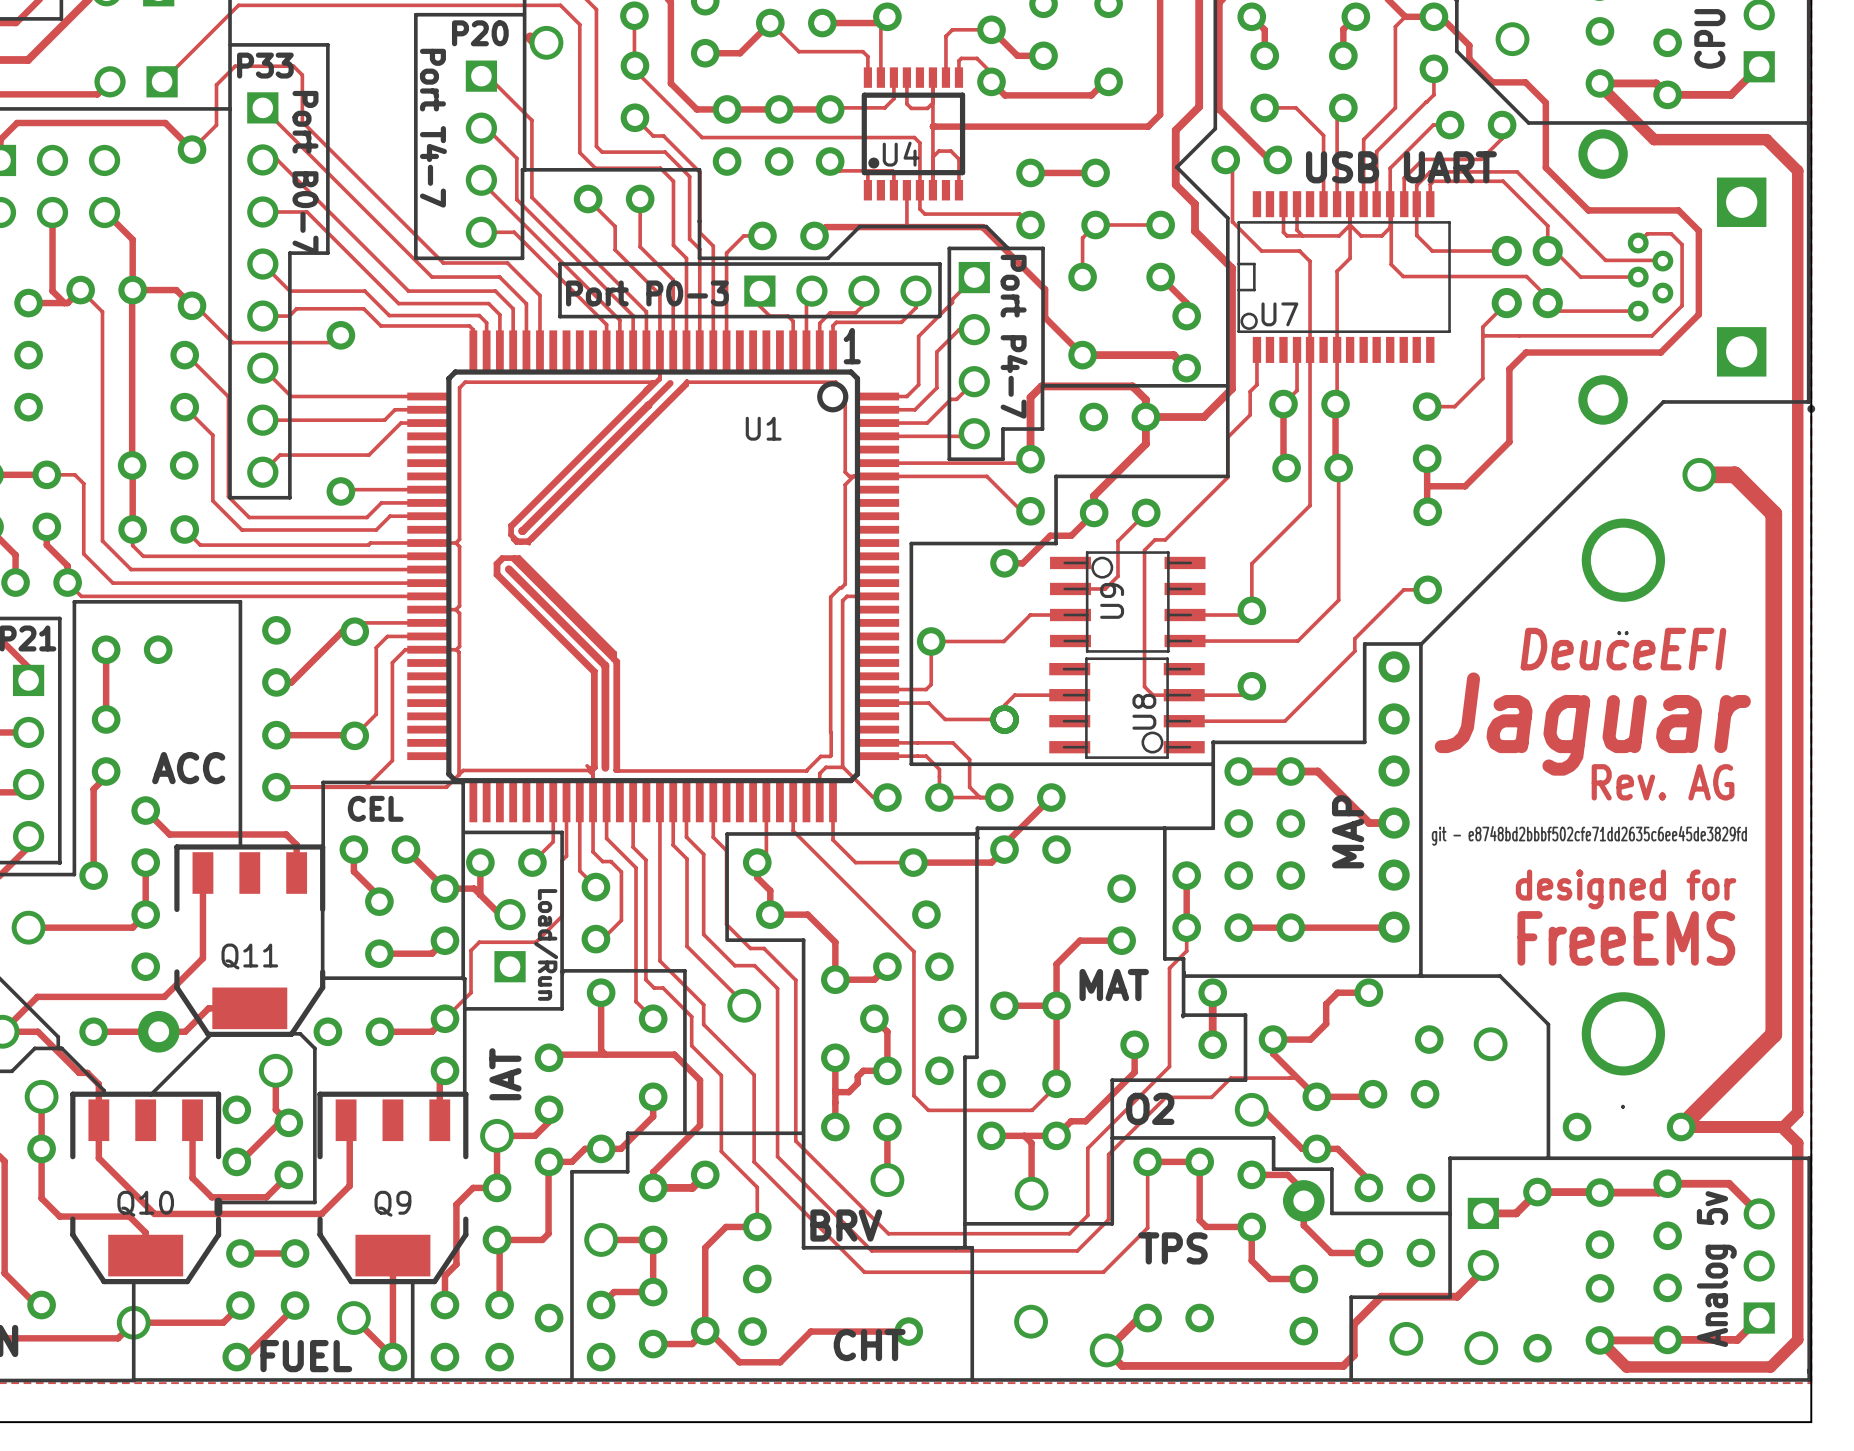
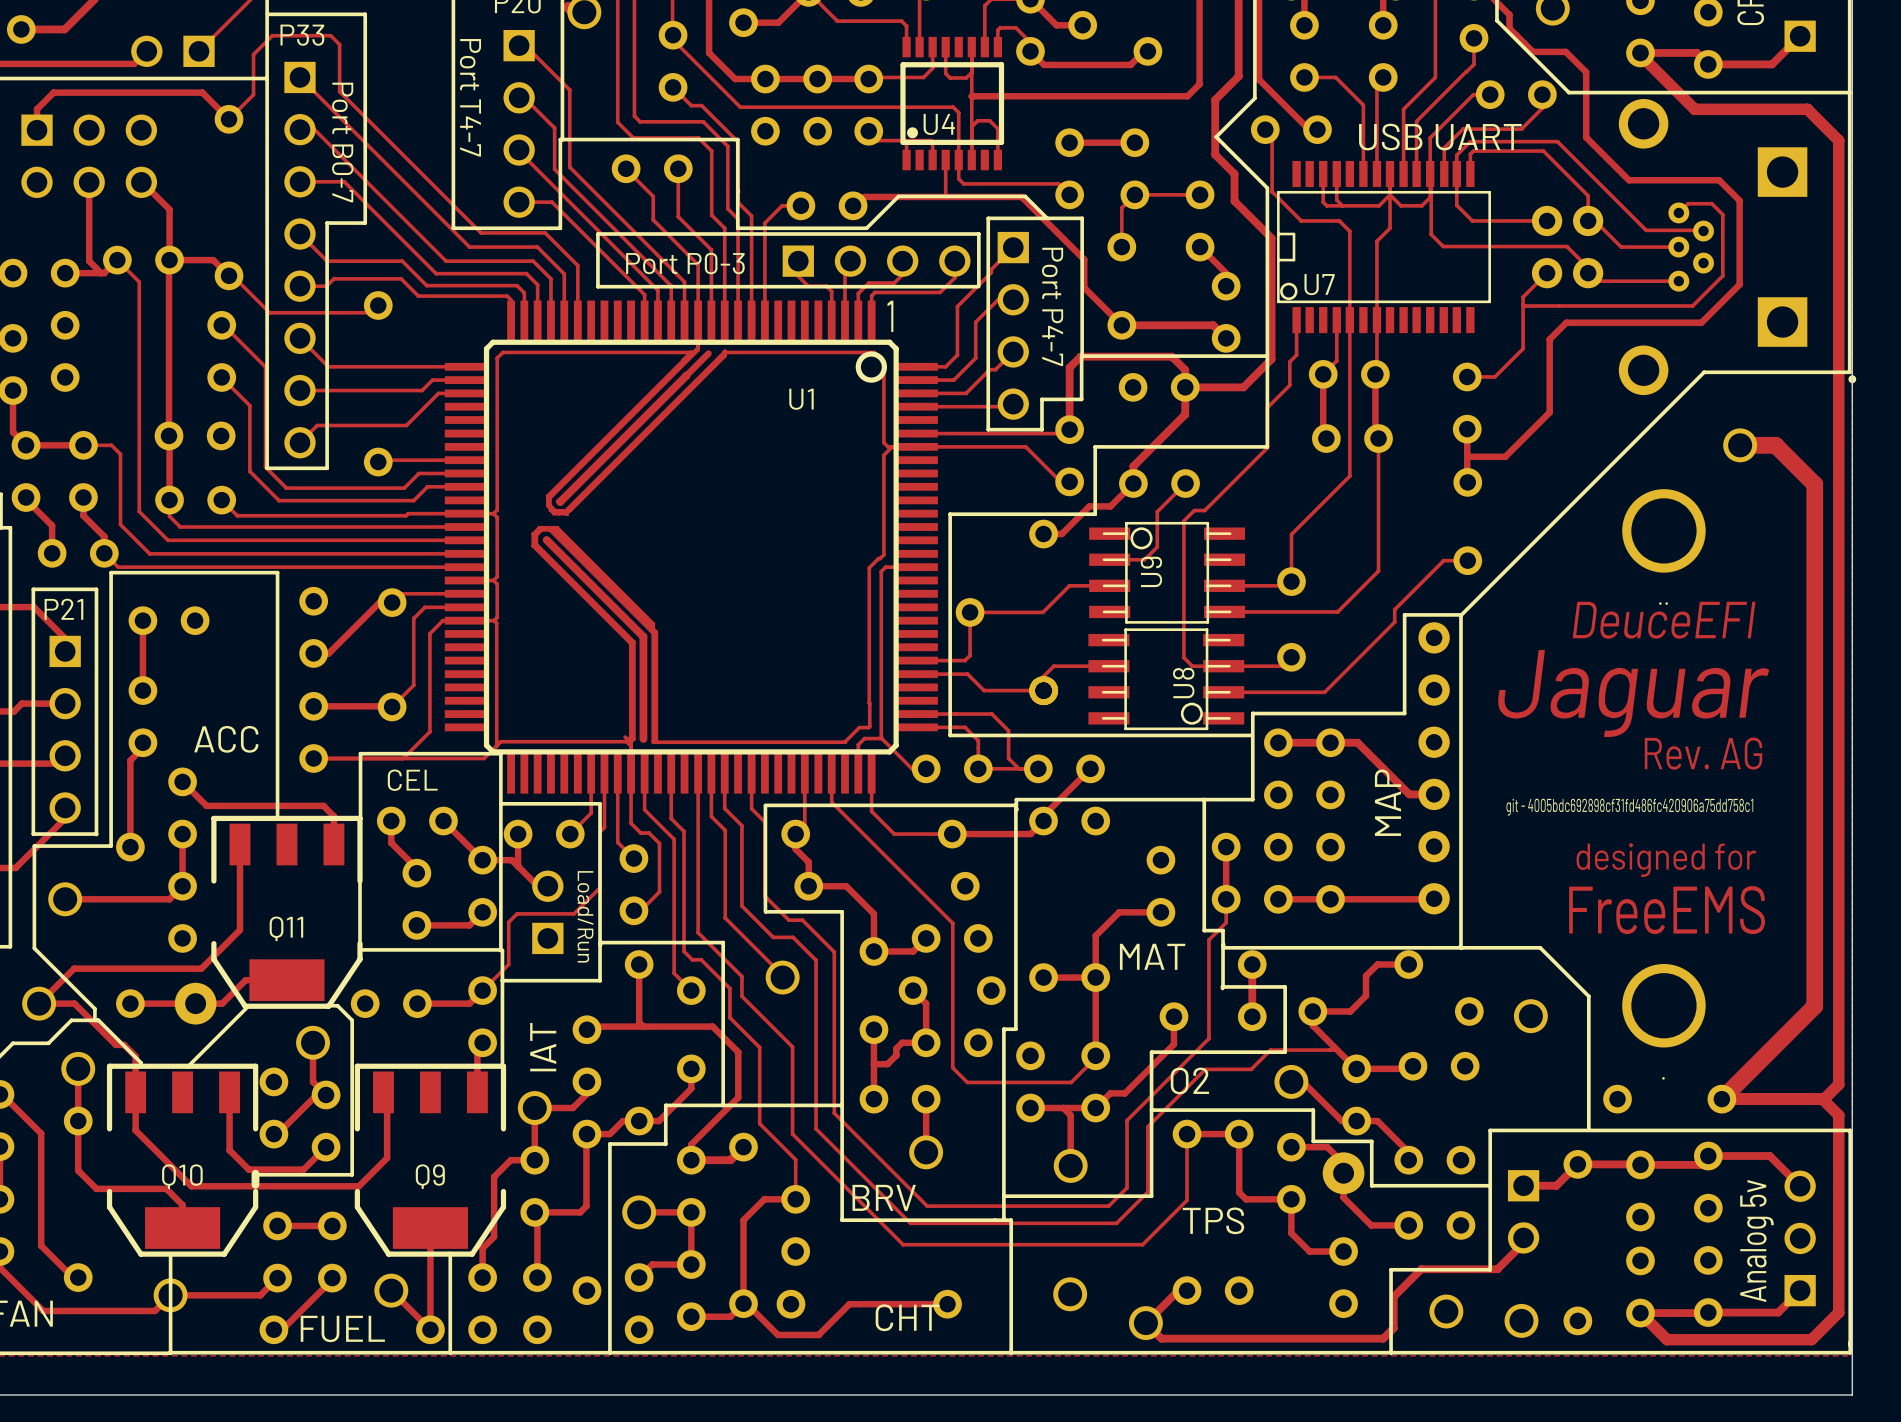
text: git - e8748bd2bbbf502cfe71dd2635c6ee45de3829fd (1589, 835) -> git - 4005bdc692898cf31fd486fc420906a75dd758c1 (1629, 807)

